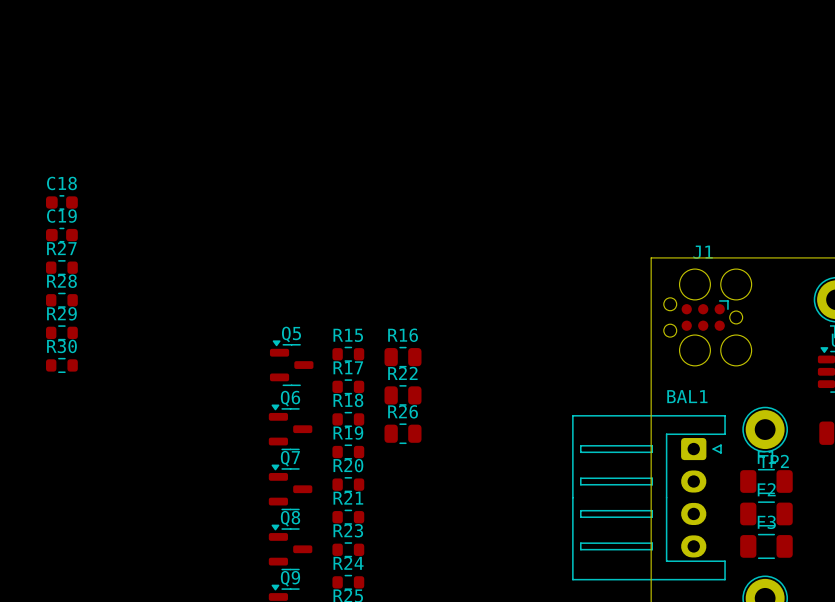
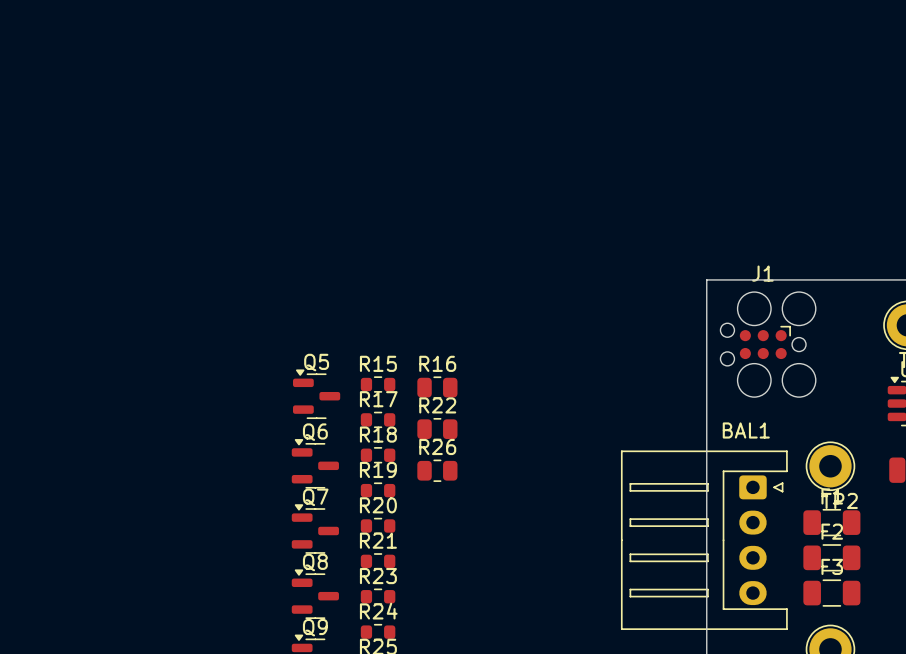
C18: (61, 202) -> none
C19: (61, 235) -> none
R27: (61, 267) -> none
R28: (61, 300) -> none
R29: (61, 332) -> none
R30: (61, 365) -> none

